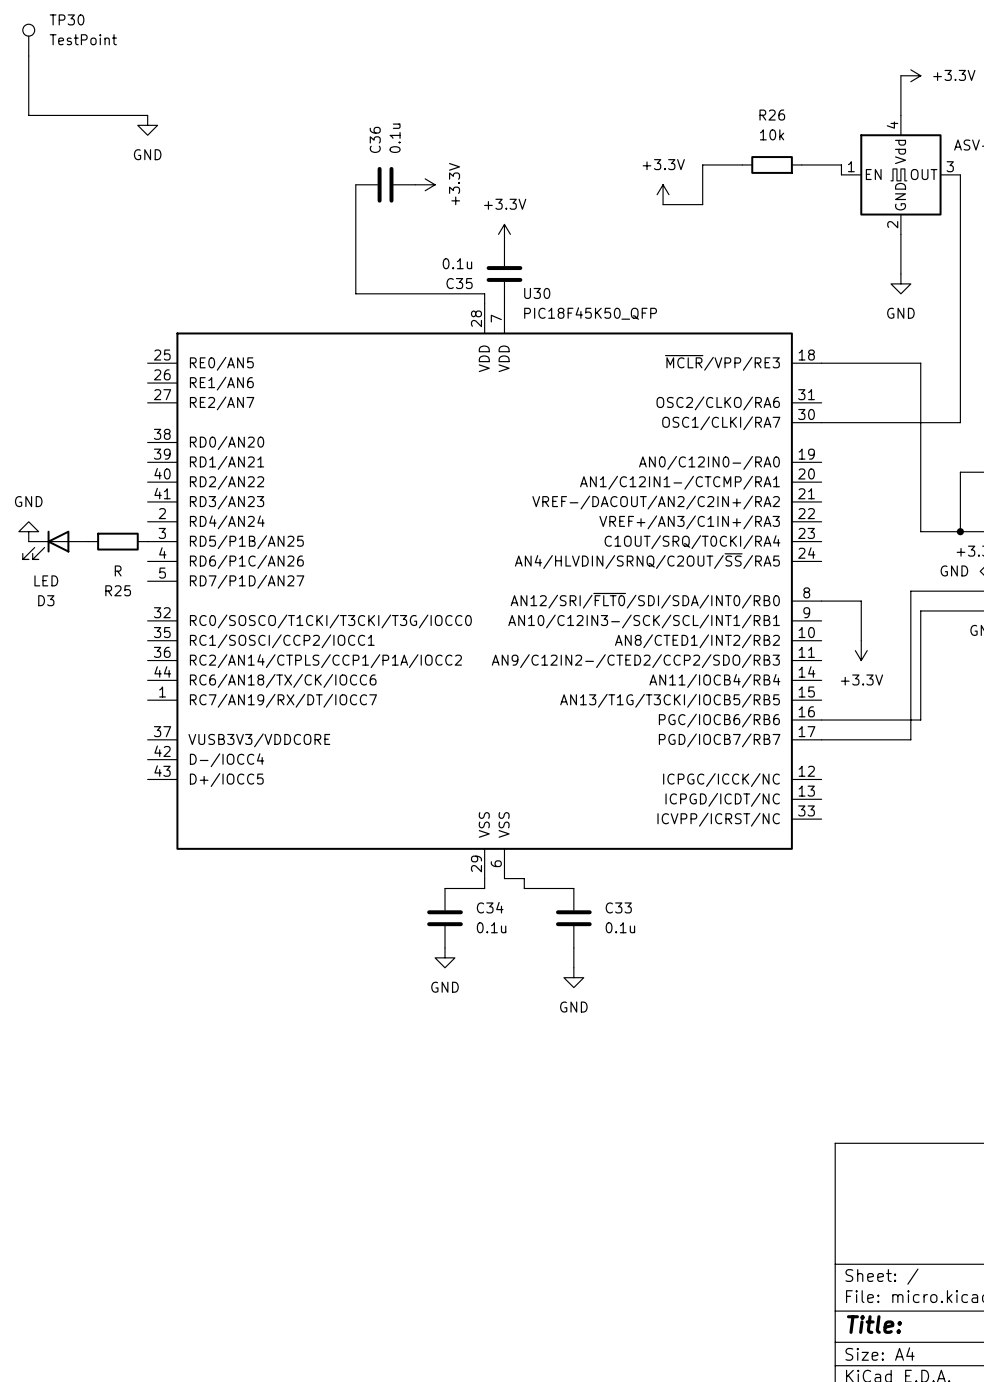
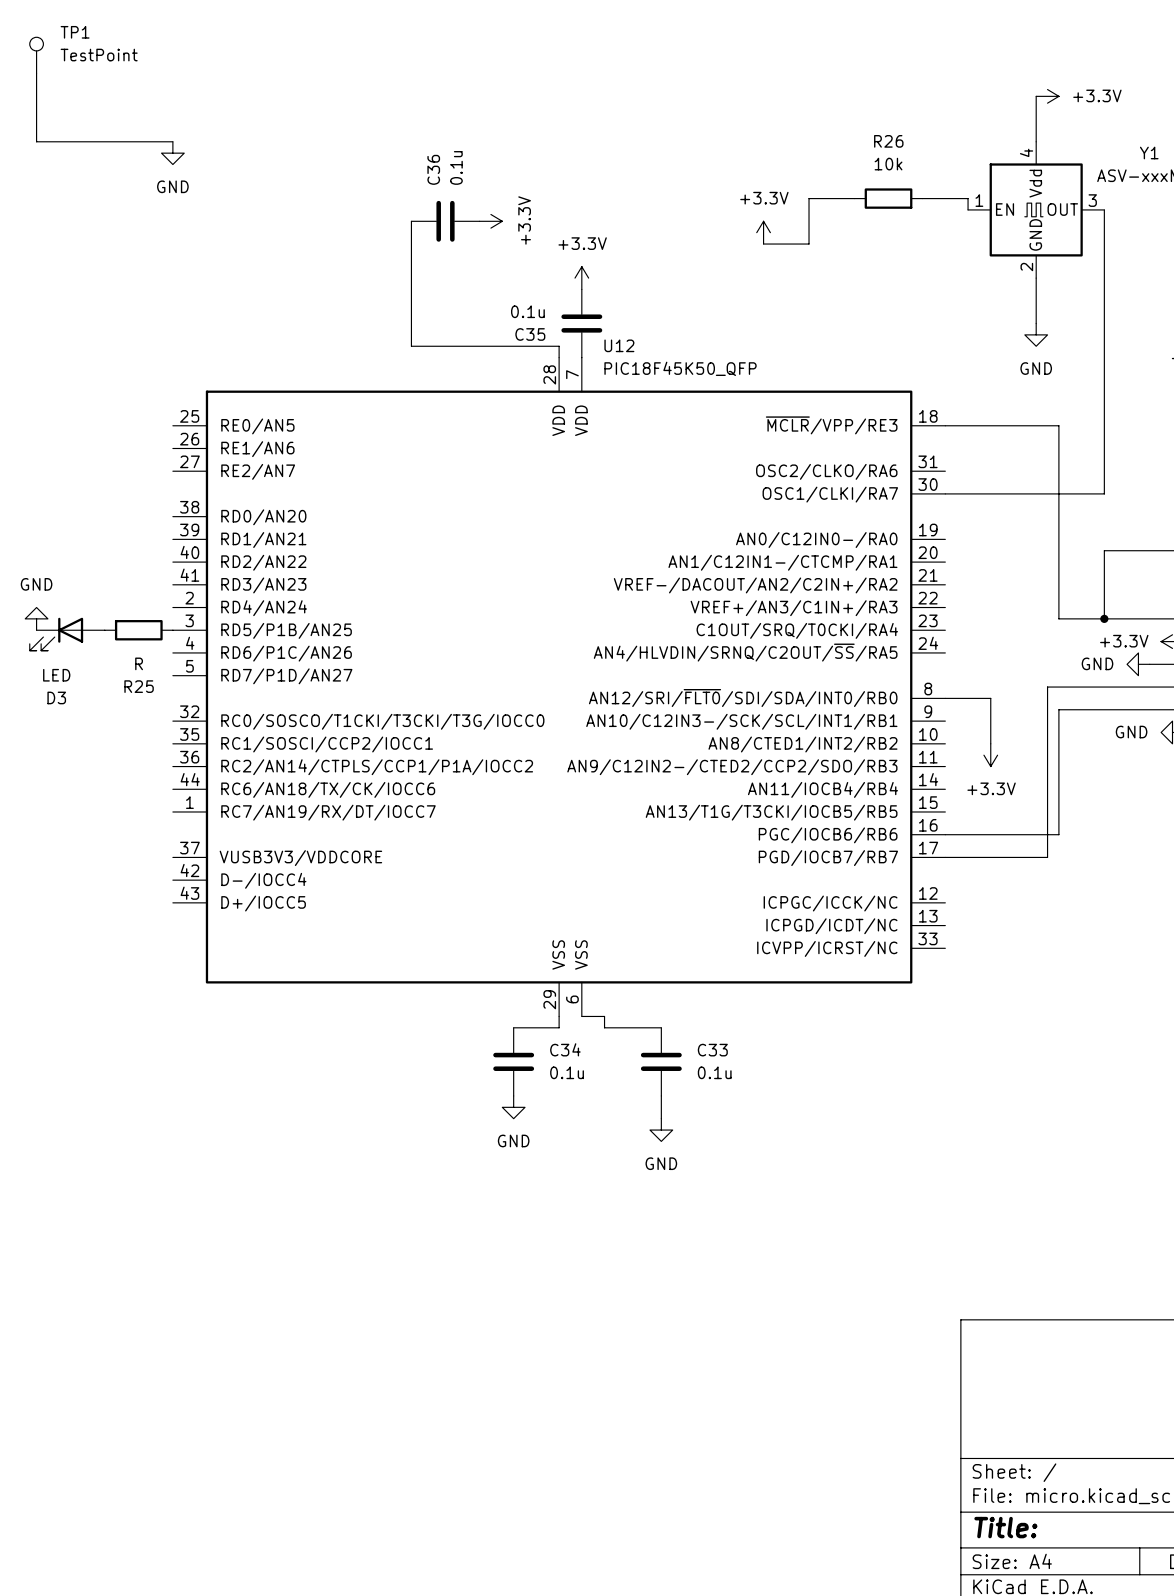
TP30 name: TP30 (67, 19) -> TP1 (75, 32)
U30 name: U30 (537, 293) -> U12 (619, 345)

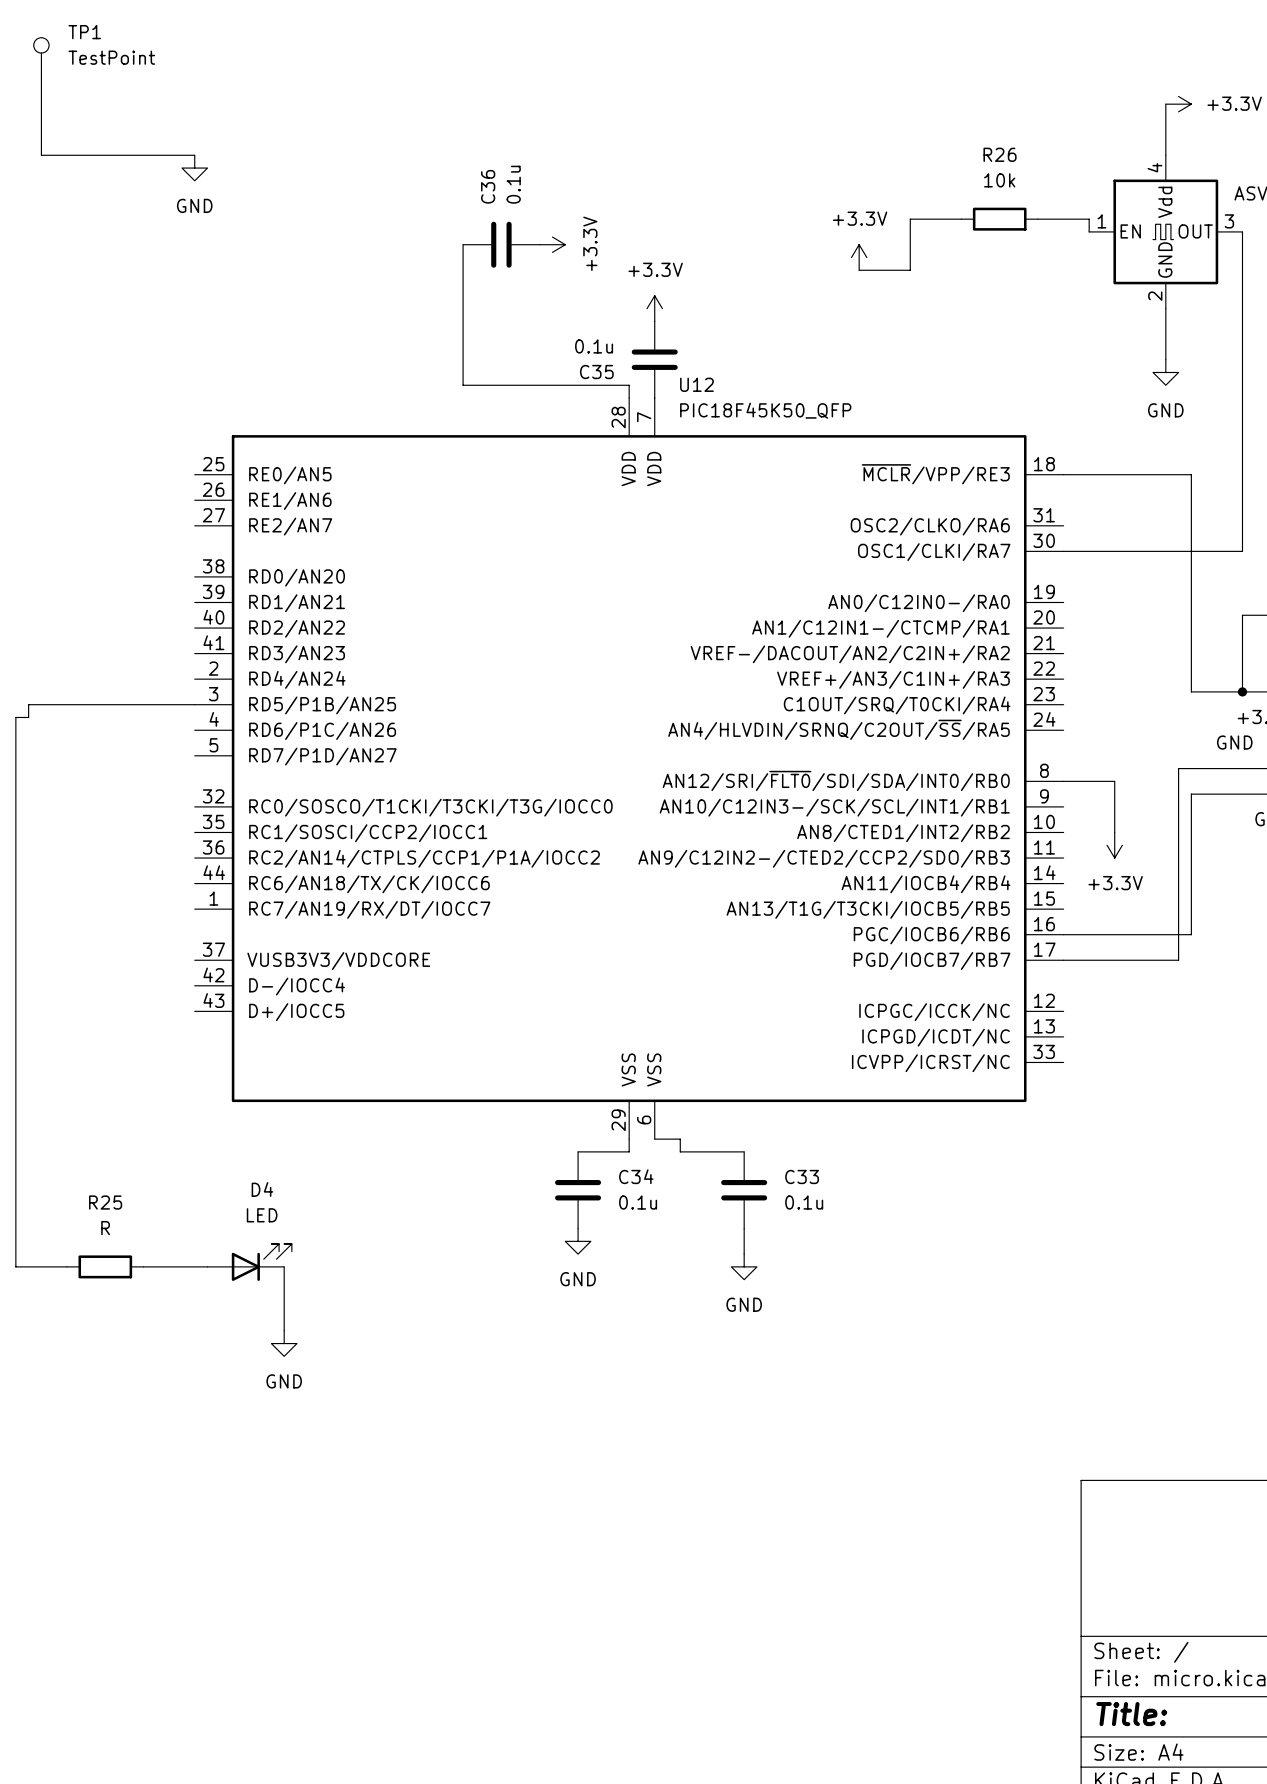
power symbol: GND (36, 618) -> none
R25 position: (138, 630) -> (105, 1266)
wire: none -> (194, 704) (28, 704) (28, 717) (15, 717) (15, 1266) (66, 1266)
D3: LED (67, 634) -> none
R25 value position: R (139, 663) -> R (105, 1228)
R25 name position: R25 (139, 686) -> R25 (105, 1202)
D4: none -> LED (249, 1262)
wire: none -> (143, 1266) (207, 1266)
wire: none -> (284, 1266) (284, 1330)
power symbol: none -> GND (284, 1343)

